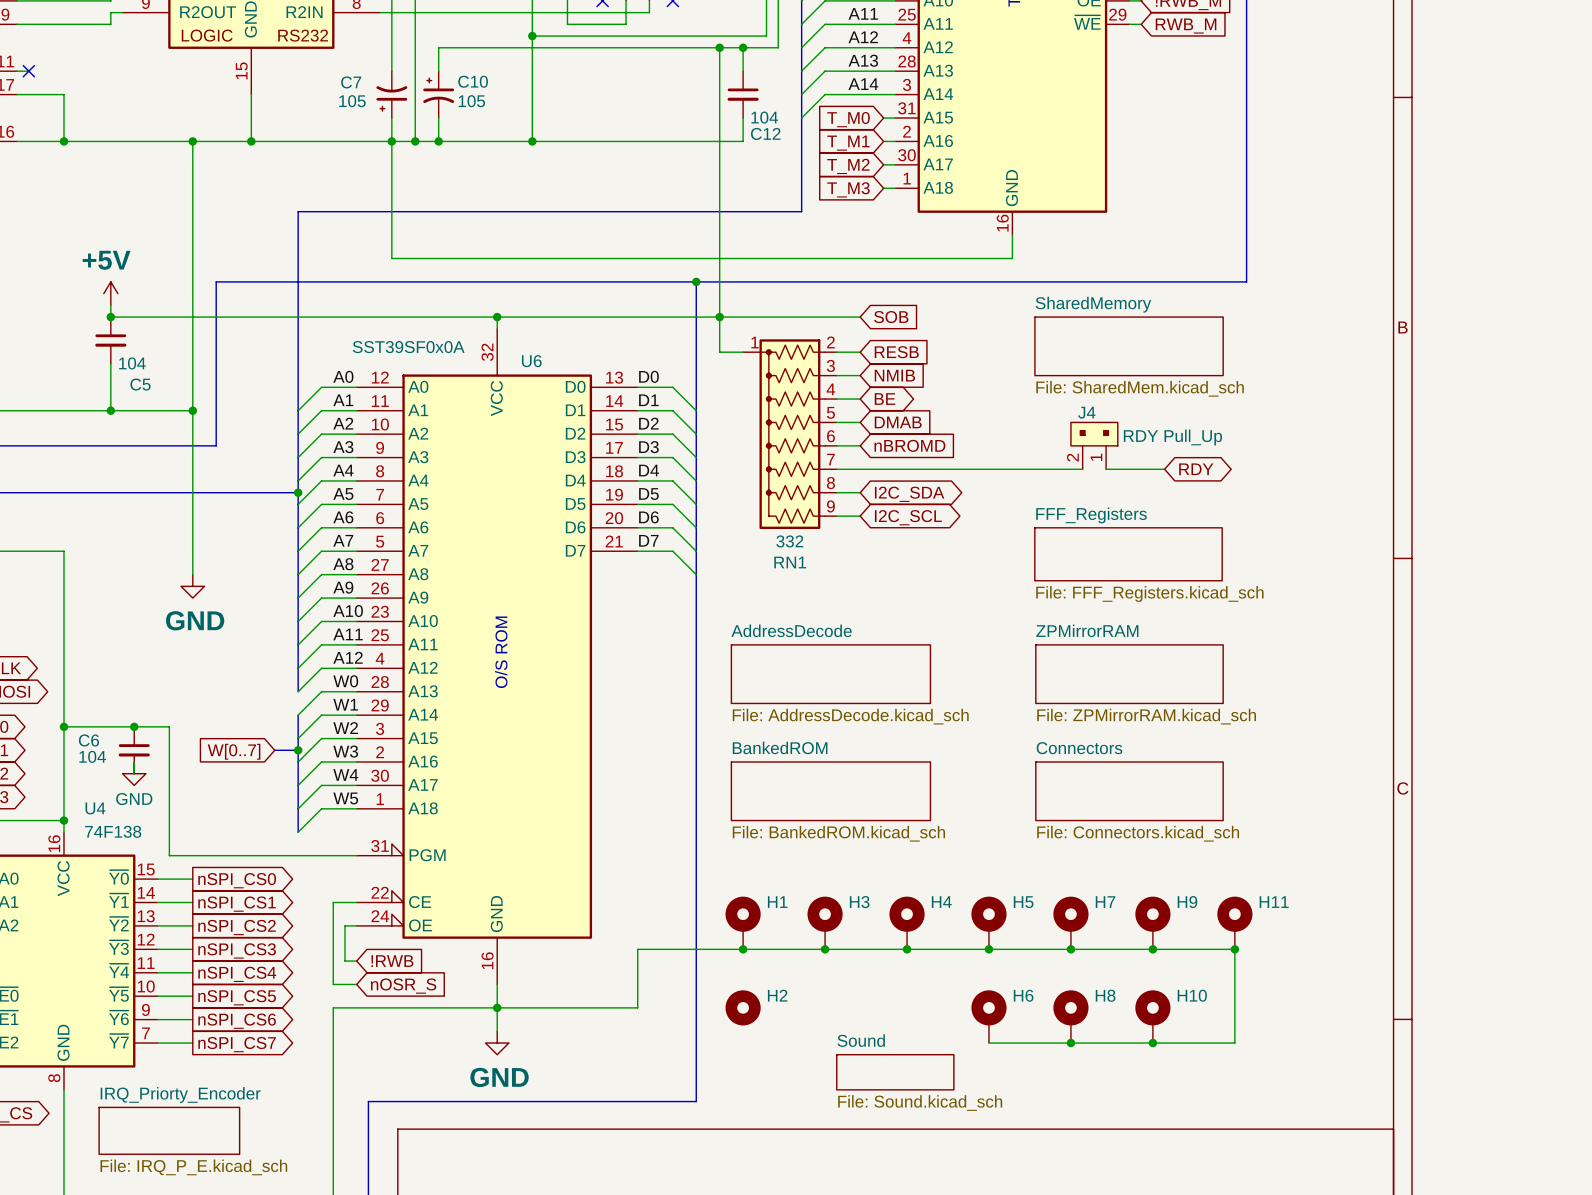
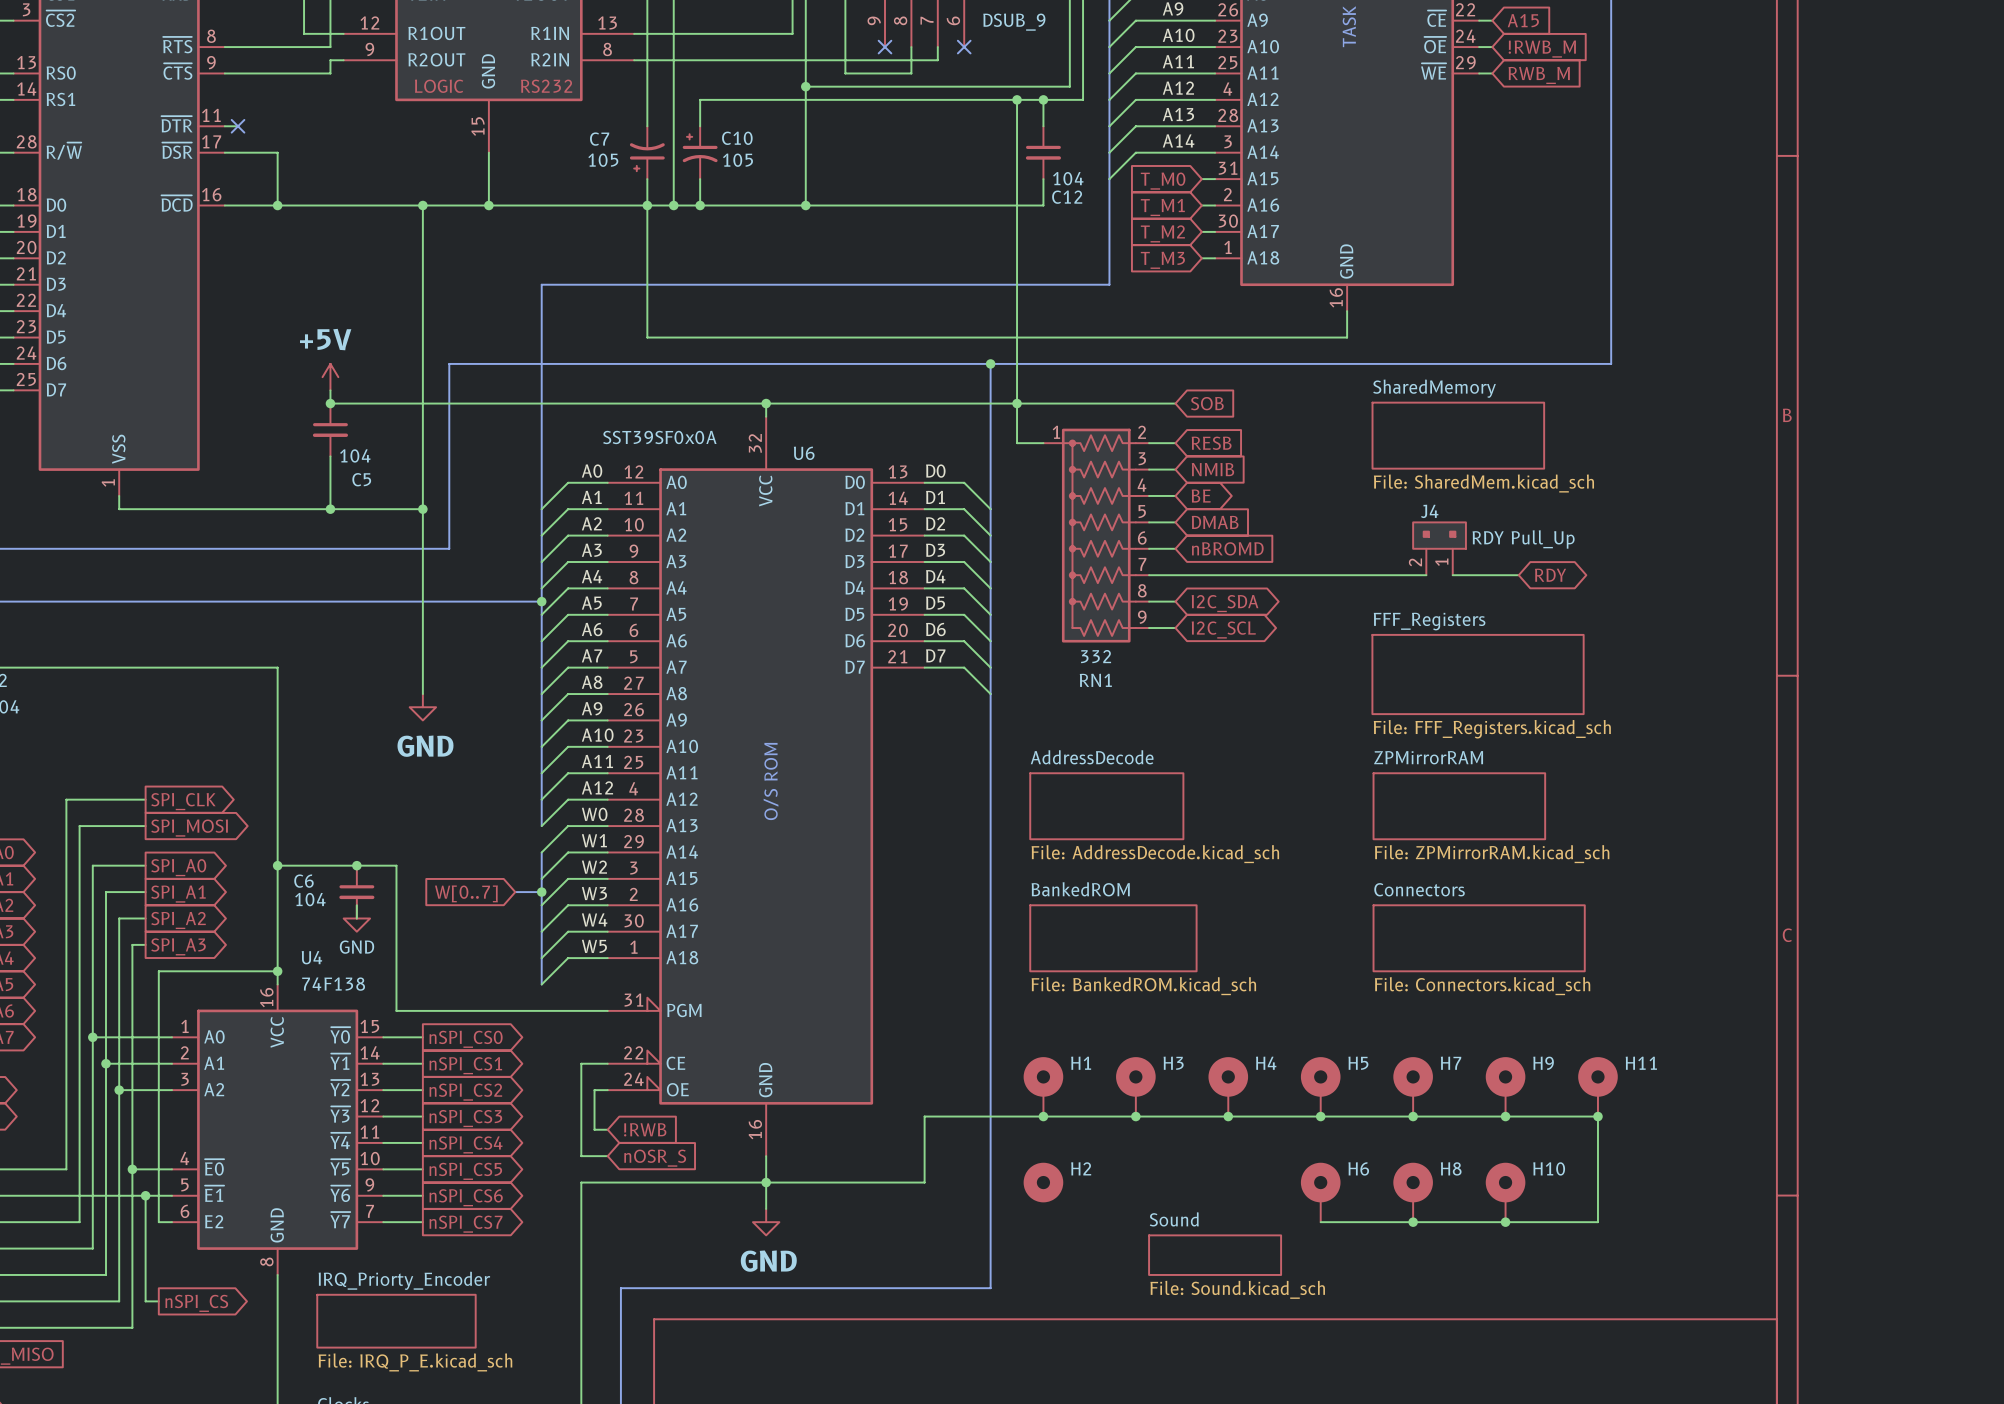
sheet SharedMemory: none -> File: SharedMem.kicad_sch (1458, 435)
sheet SharedMemory: File: SharedMem.kicad_sch (1129, 346) -> none
sheet FFF_Registers shape: [1034, 527, 1223, 582] -> [1371, 634, 1585, 715]
sheet AddressDecode: none -> File: AddressDecode.kicad_sch (1106, 806)
sheet AddressDecode: File: AddressDecode.kicad_sch (830, 674) -> none
sheet ZPMirrorRAM: none -> File: ZPMirrorRAM.kicad_sch (1459, 806)
sheet ZPMirrorRAM: File: ZPMirrorRAM.kicad_sch (1129, 674) -> none
sheet BankedROM: none -> File: BankedROM.kicad_sch (1113, 938)
sheet BankedROM: File: BankedROM.kicad_sch (830, 791) -> none

